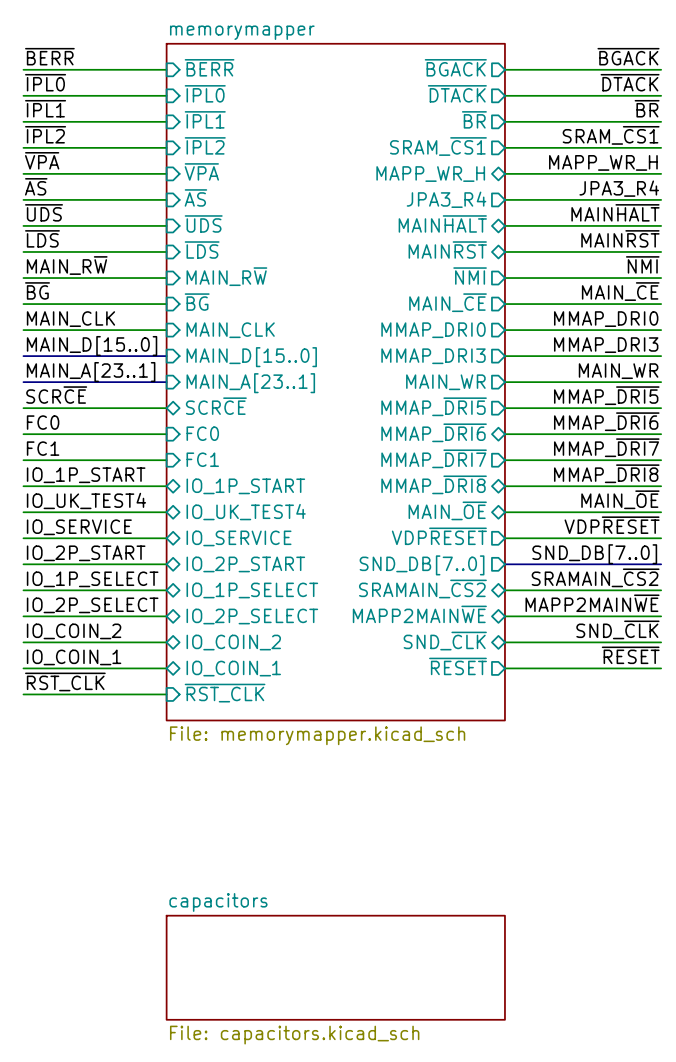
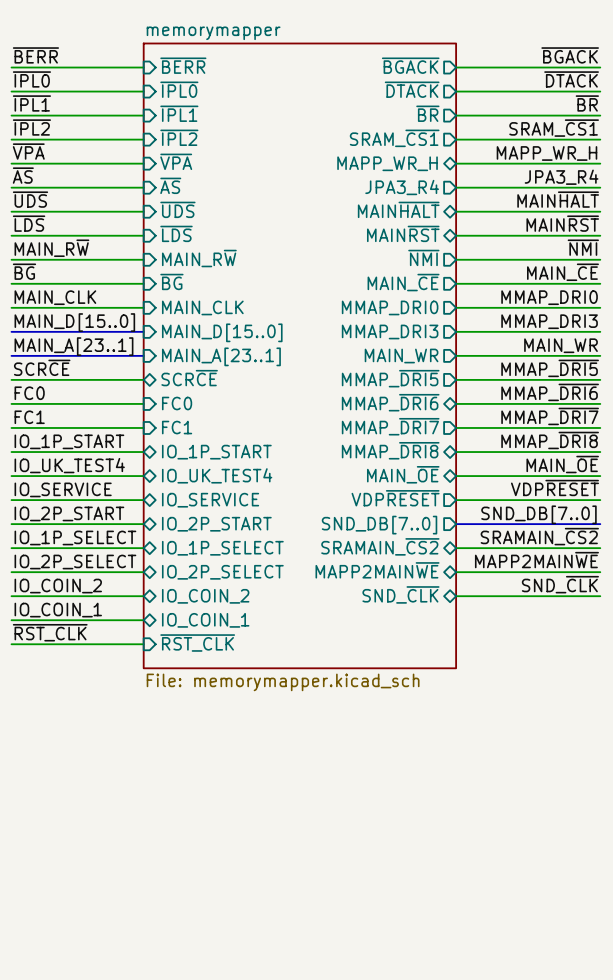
label: ~{RESET} (630, 655) -> none
sheet pin: ~{RESET} (458, 666) -> none
wire: (504, 668) (661, 668) -> none
sheet capacitors: File: capacitors.kicad_sch (335, 967) -> none

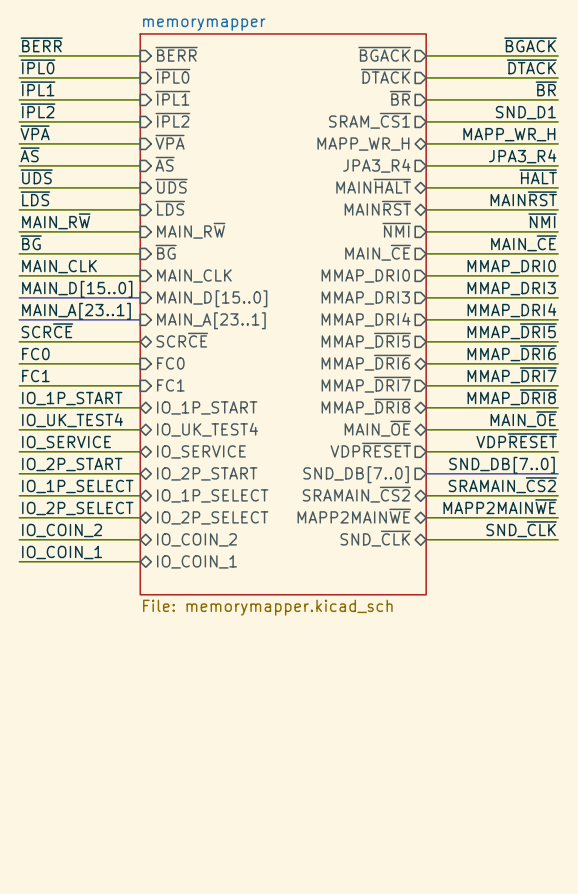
sheet memorymapper shape: [143, 43, 457, 669] -> [140, 33, 427, 595]
label: SRAM_~{CS1} (554, 128) -> SND_D1 (525, 112)
label: MAIN~{HALT} (558, 199) -> ~{HALT} (538, 176)
label: MAIN_WR (561, 345) -> MMAP_DRI4 (511, 310)
sheet pin: MAIN_WR (401, 356) -> MMAP_DRI4 (366, 319)
label: ~{RST_CLK} (50, 632) -> none
sheet pin: ~{RST_CLK} (197, 643) -> none
wire: (11, 644) (143, 644) -> none

